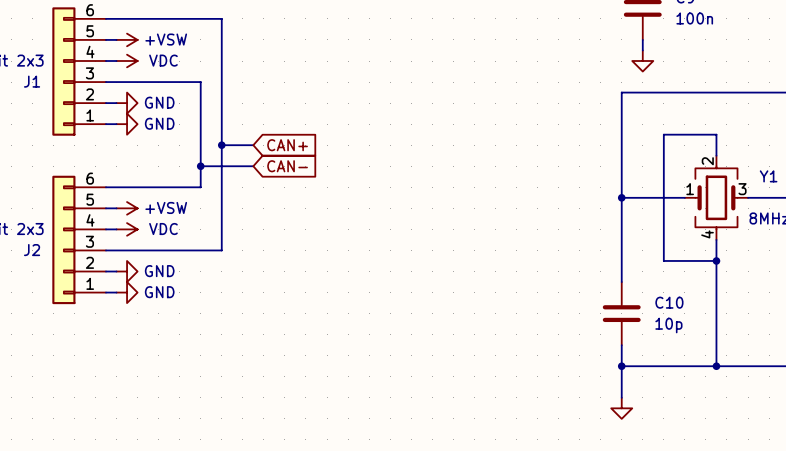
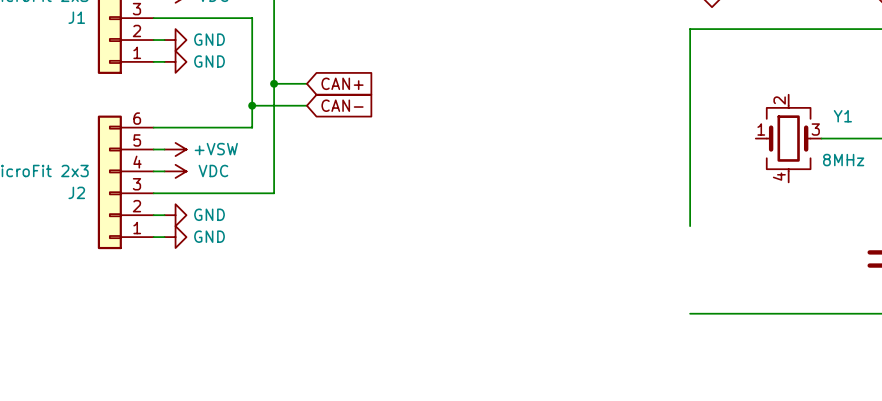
wire: (716, 155) (716, 134) (663, 134) (663, 260) (716, 260) -> none
wire: (621, 197) (684, 197) -> none
junction: (621, 197) -> none
wire: (716, 239) (716, 366) -> none
junction: (716, 260) -> none
C10: 10p (621, 313) -> none
wire: (621, 345) (621, 397) -> none
junction: (621, 366) -> none
junction: (716, 366) -> none
power symbol: (621, 408) -> none

